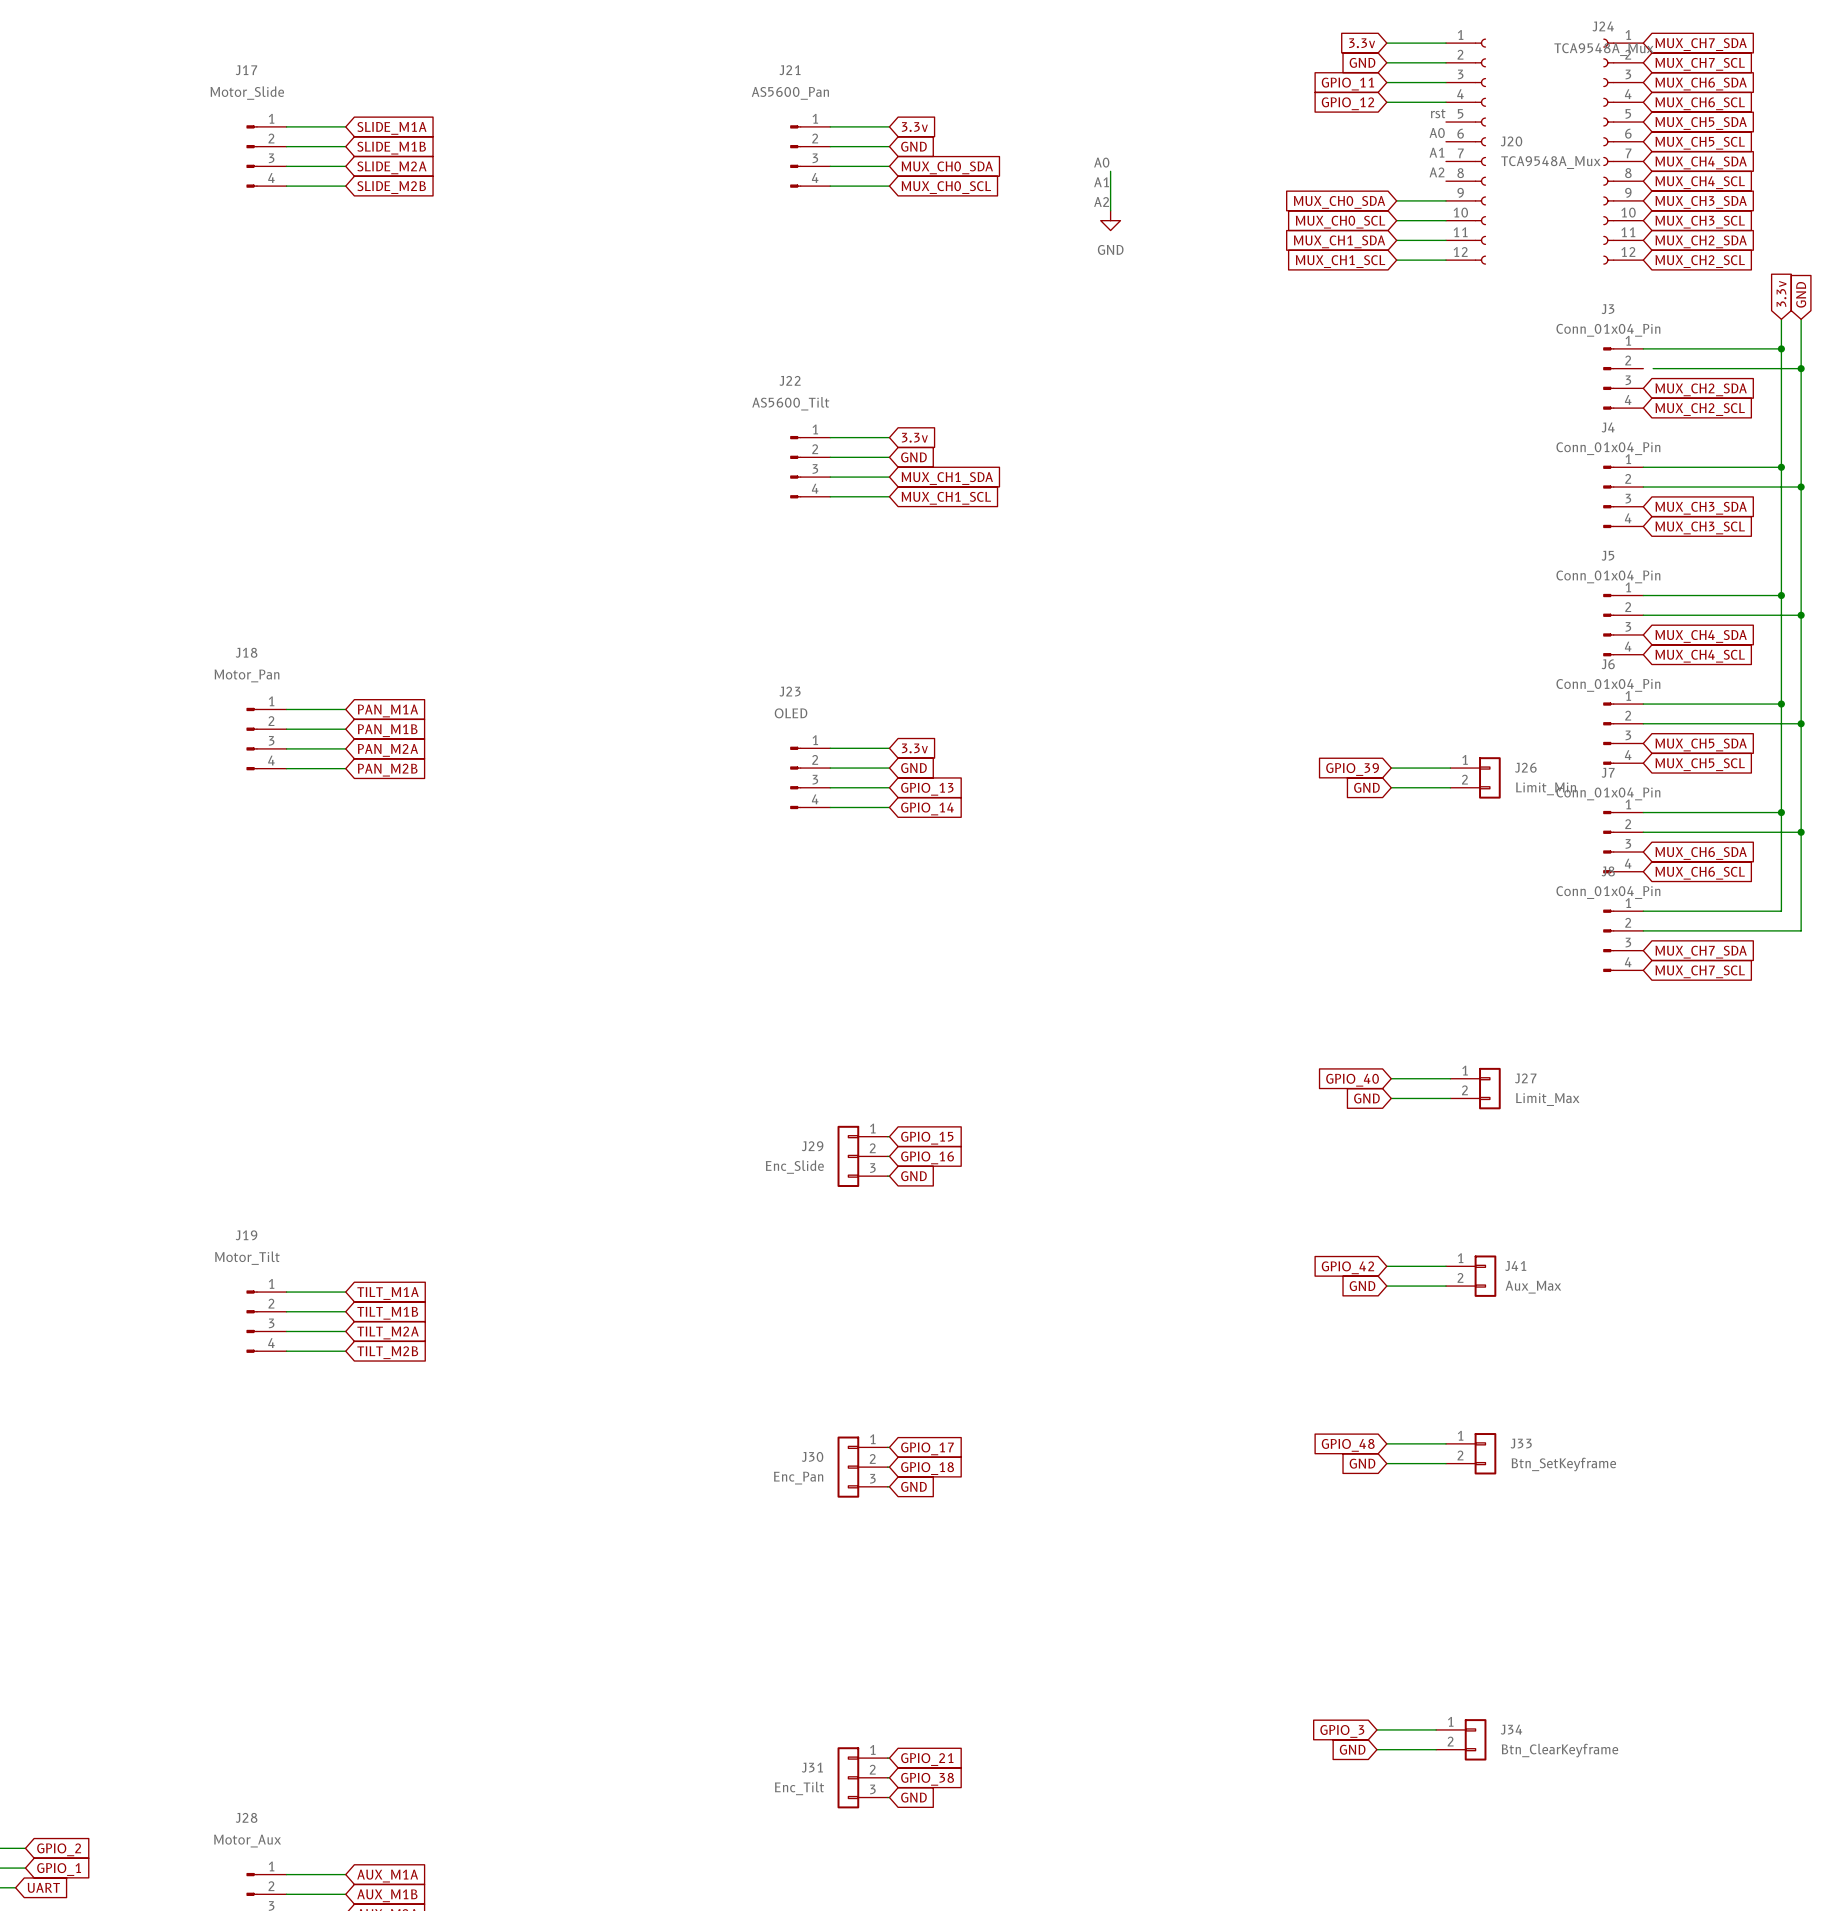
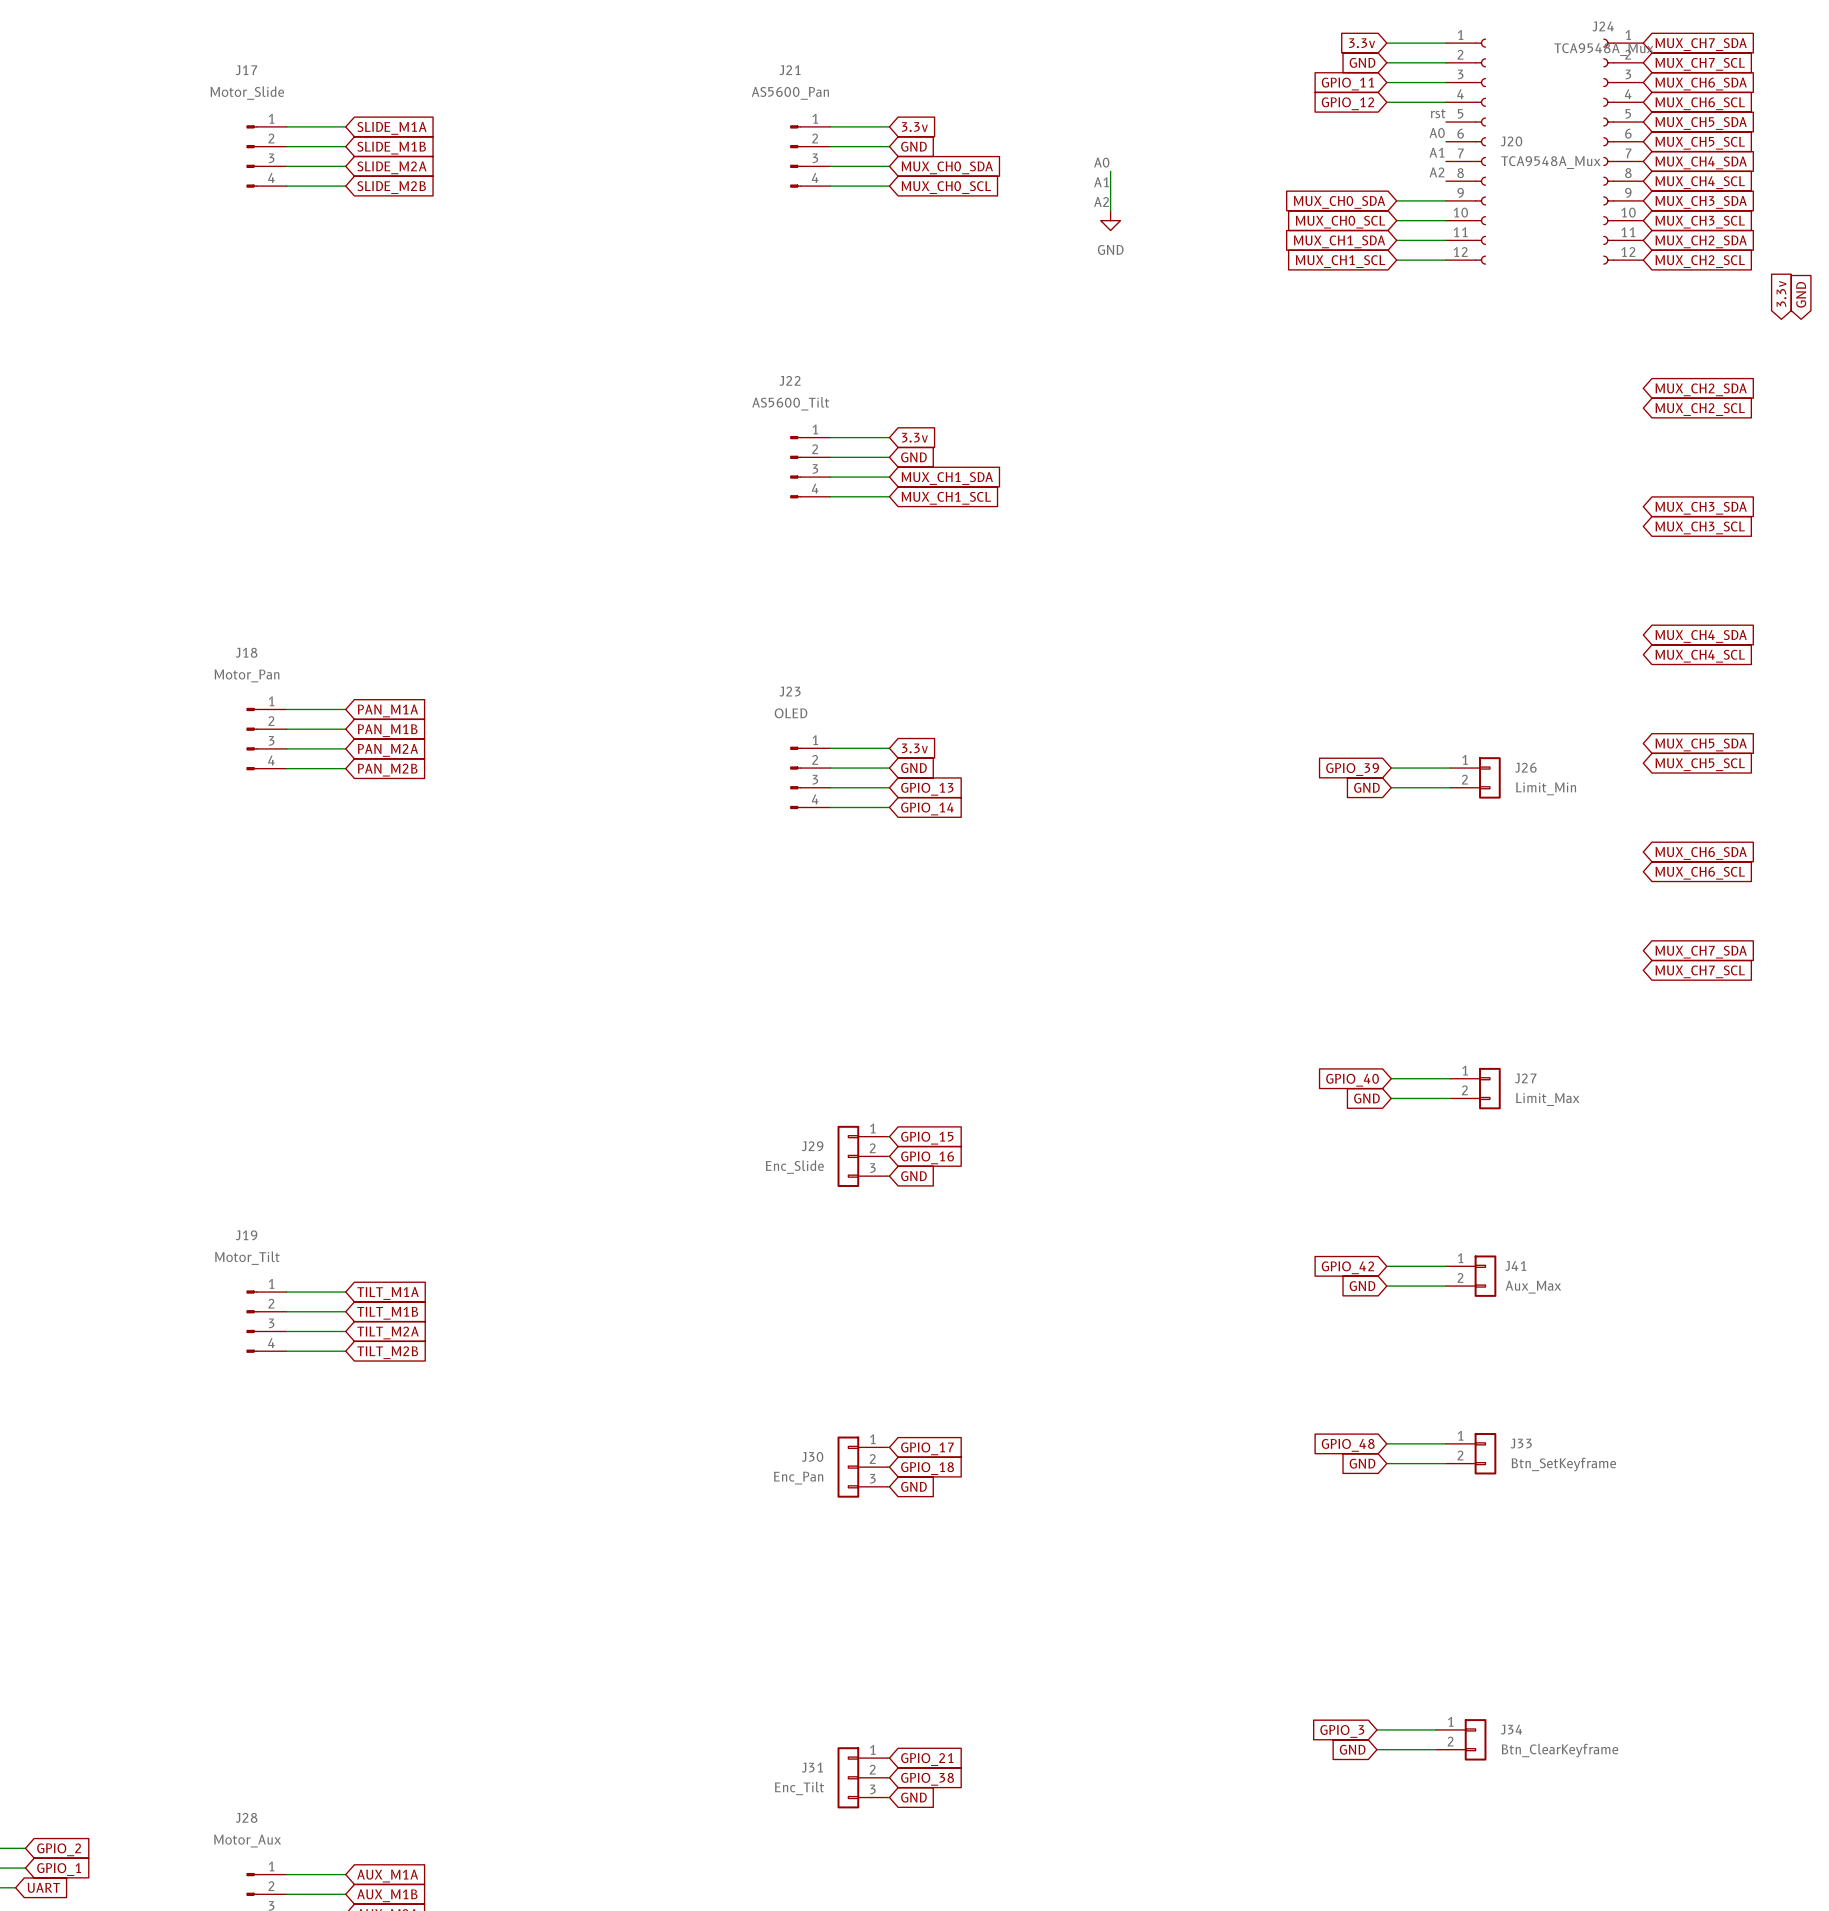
wire: (1781, 319) (1781, 911) (1643, 911) -> none
wire: (1801, 319) (1801, 930) (1643, 930) -> none
wire: (1643, 348) (1781, 348) -> none
junction: (1781, 348) -> none
wire: (1653, 368) (1801, 368) -> none
junction: (1801, 368) -> none
J3: Conn_01x04_Pin (1623, 378) -> none
wire: (1643, 467) (1781, 467) -> none
junction: (1781, 467) -> none
wire: (1643, 487) (1801, 487) -> none
junction: (1801, 487) -> none
J4: Conn_01x04_Pin (1623, 496) -> none
wire: (1643, 595) (1781, 595) -> none
junction: (1781, 595) -> none
wire: (1643, 615) (1801, 615) -> none
junction: (1801, 615) -> none
J5: Conn_01x04_Pin (1623, 625) -> none
wire: (1643, 704) (1781, 704) -> none
junction: (1781, 704) -> none
wire: (1643, 723) (1801, 723) -> none
junction: (1801, 723) -> none
J6: Conn_01x04_Pin (1623, 733) -> none
wire: (1643, 812) (1781, 812) -> none
junction: (1781, 812) -> none
wire: (1643, 832) (1801, 832) -> none
junction: (1801, 832) -> none
J7: Conn_01x04_Pin (1623, 842) -> none
J8: Conn_01x04_Pin (1623, 940) -> none

